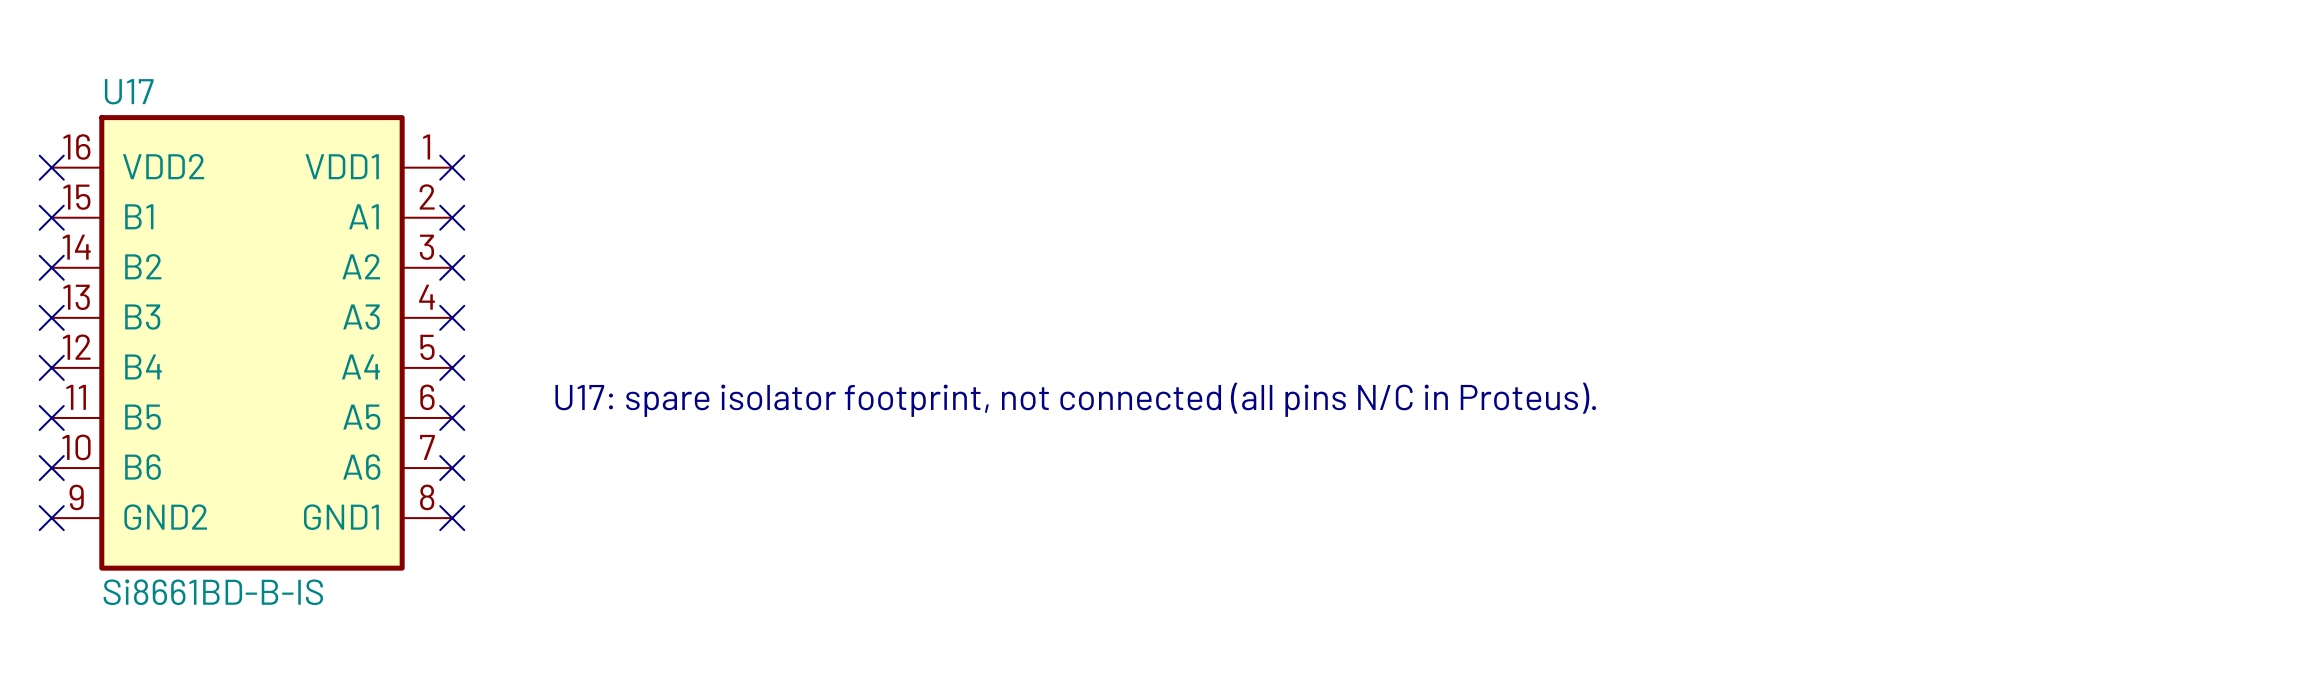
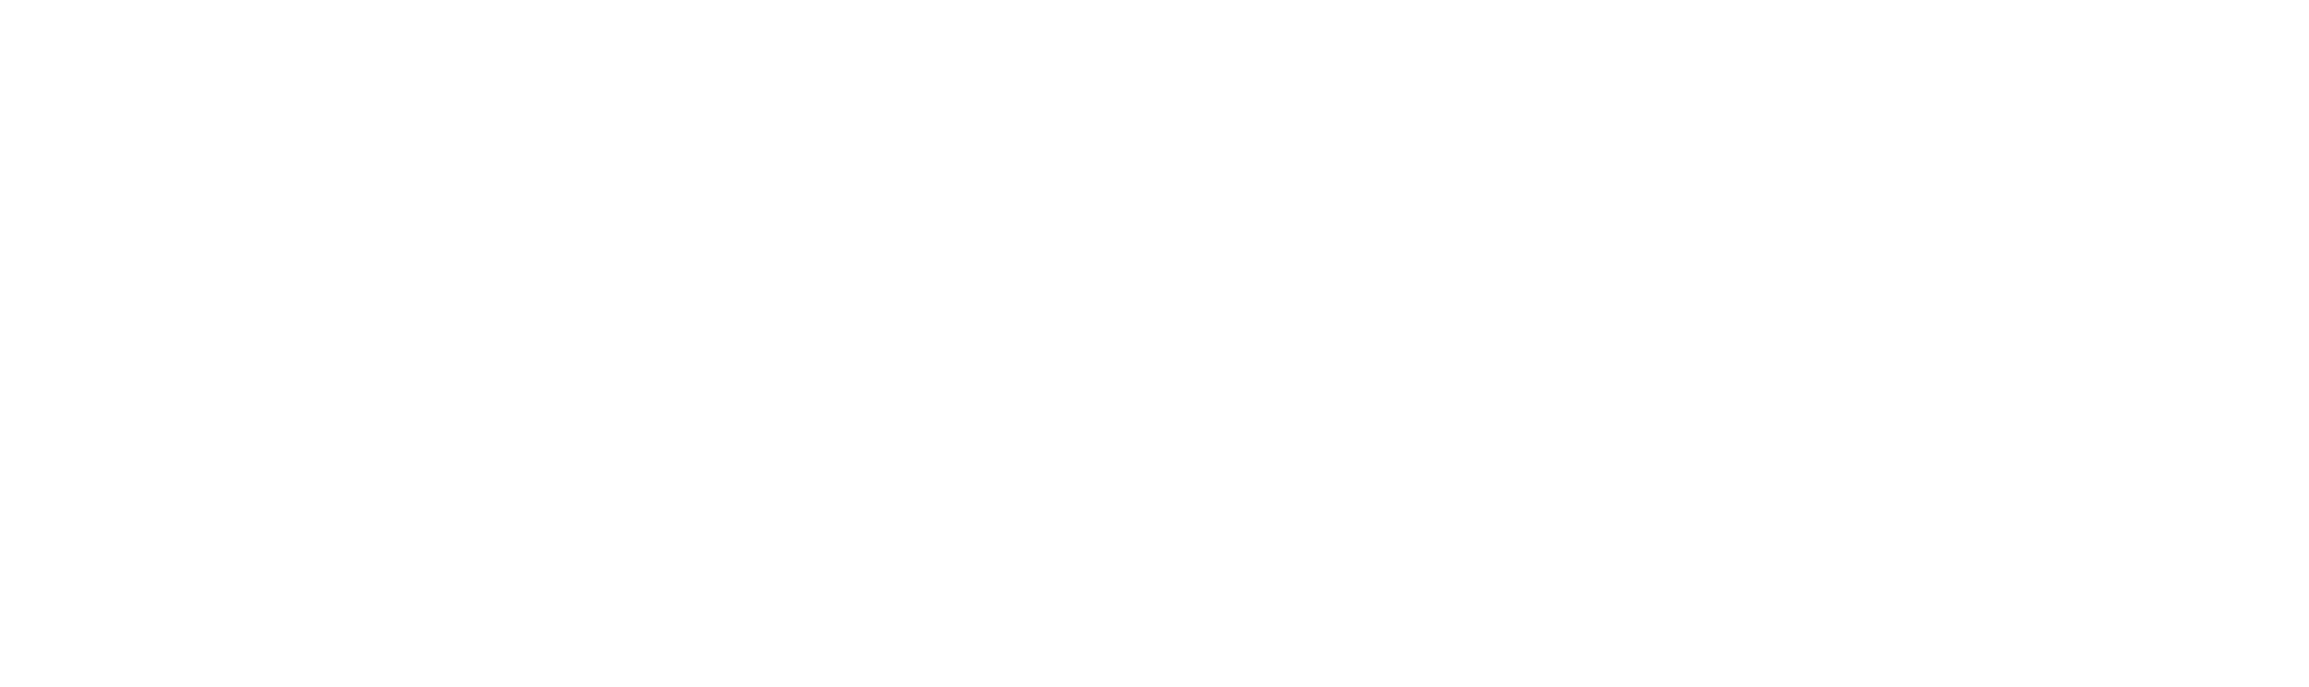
no-connect mark: (51, 167) -> none
no-connect mark: (452, 167) -> none
no-connect mark: (51, 217) -> none
no-connect mark: (452, 217) -> none
no-connect mark: (51, 267) -> none
no-connect mark: (452, 267) -> none
no-connect mark: (51, 317) -> none
no-connect mark: (452, 317) -> none
U17: Si8661BD-B-IS (251, 342) -> none
no-connect mark: (51, 367) -> none
no-connect mark: (452, 367) -> none
text: U17: spare isolator footprint, not connected (all pins N/C in Proteus). (1075, 399) -> none
no-connect mark: (51, 417) -> none
no-connect mark: (452, 417) -> none
no-connect mark: (51, 468) -> none
no-connect mark: (452, 468) -> none
no-connect mark: (51, 518) -> none
no-connect mark: (452, 518) -> none

